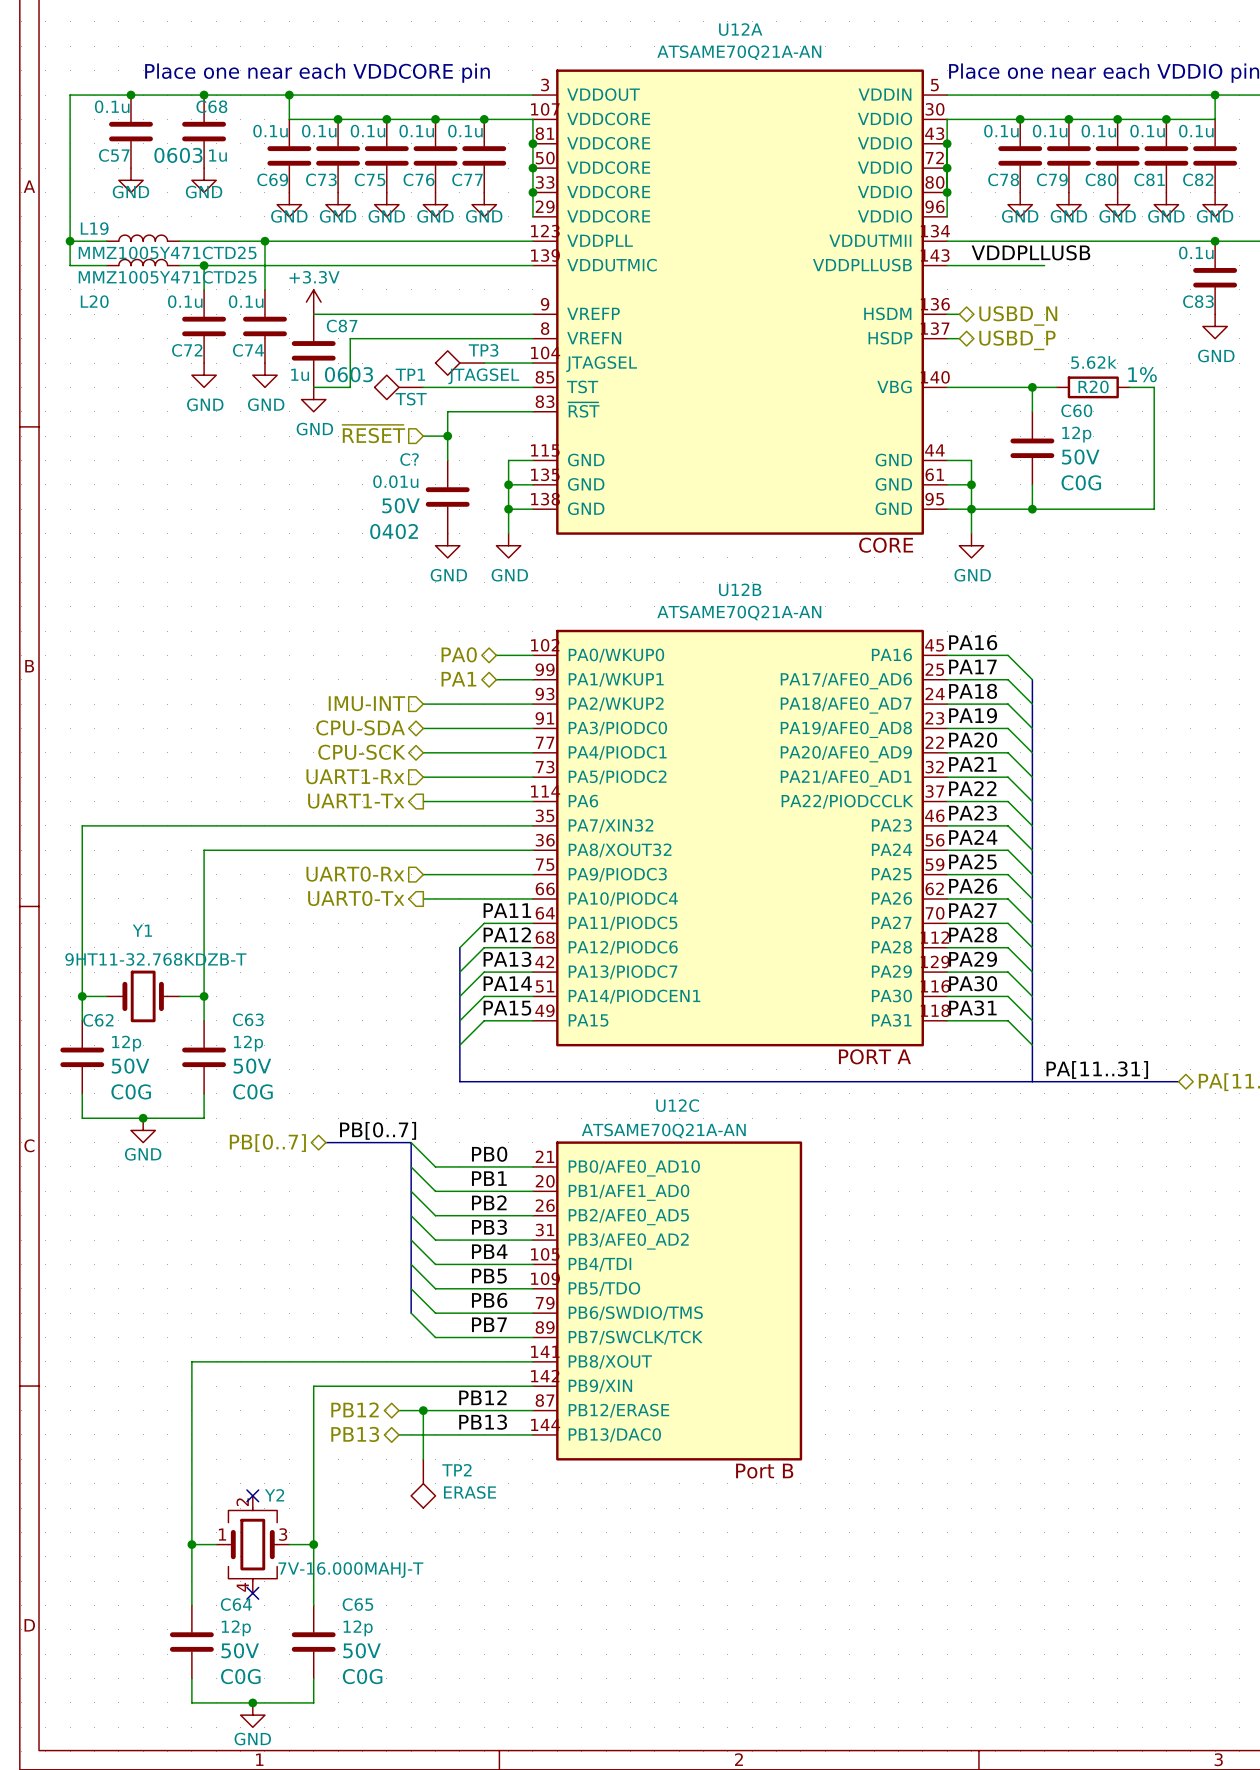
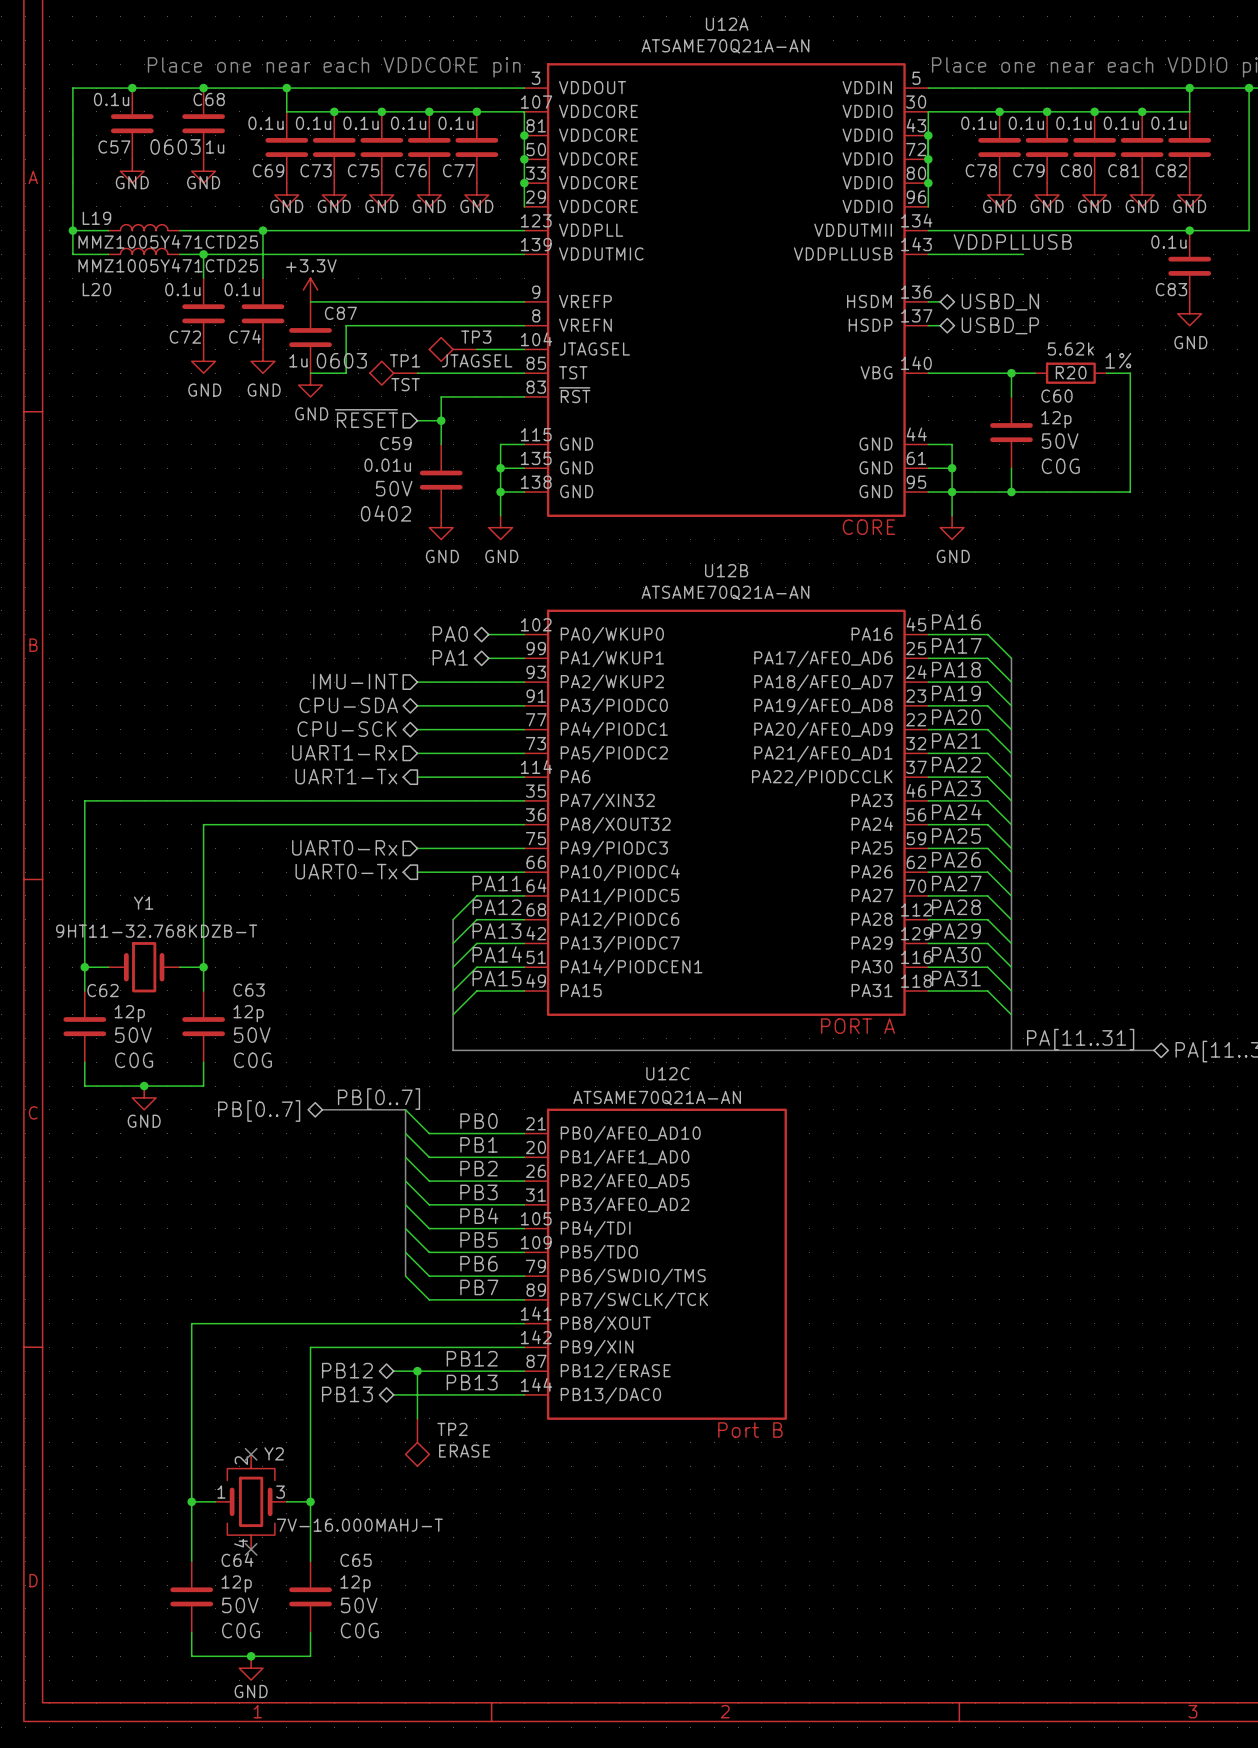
C? name: C? (409, 459) -> C59 (395, 443)

